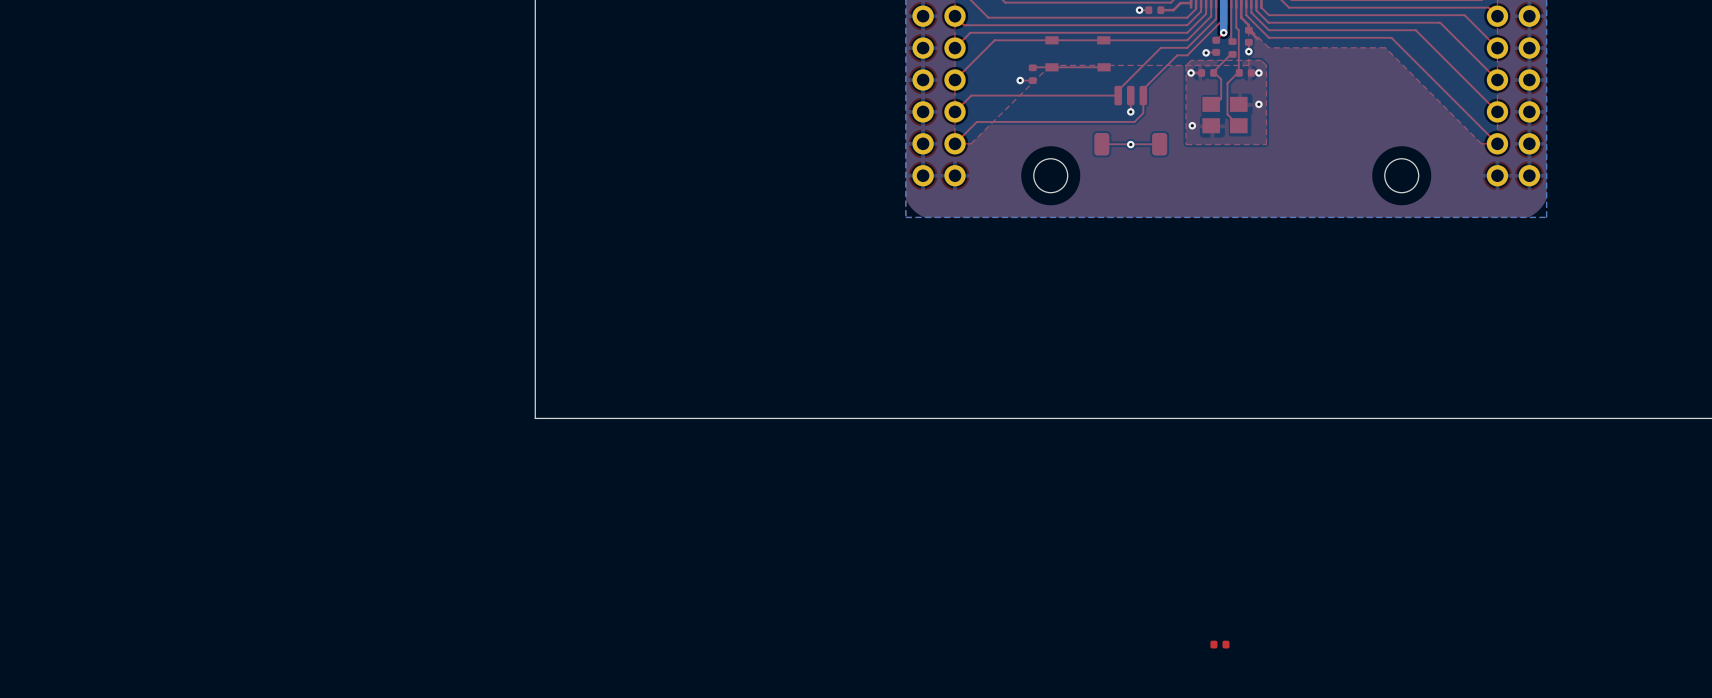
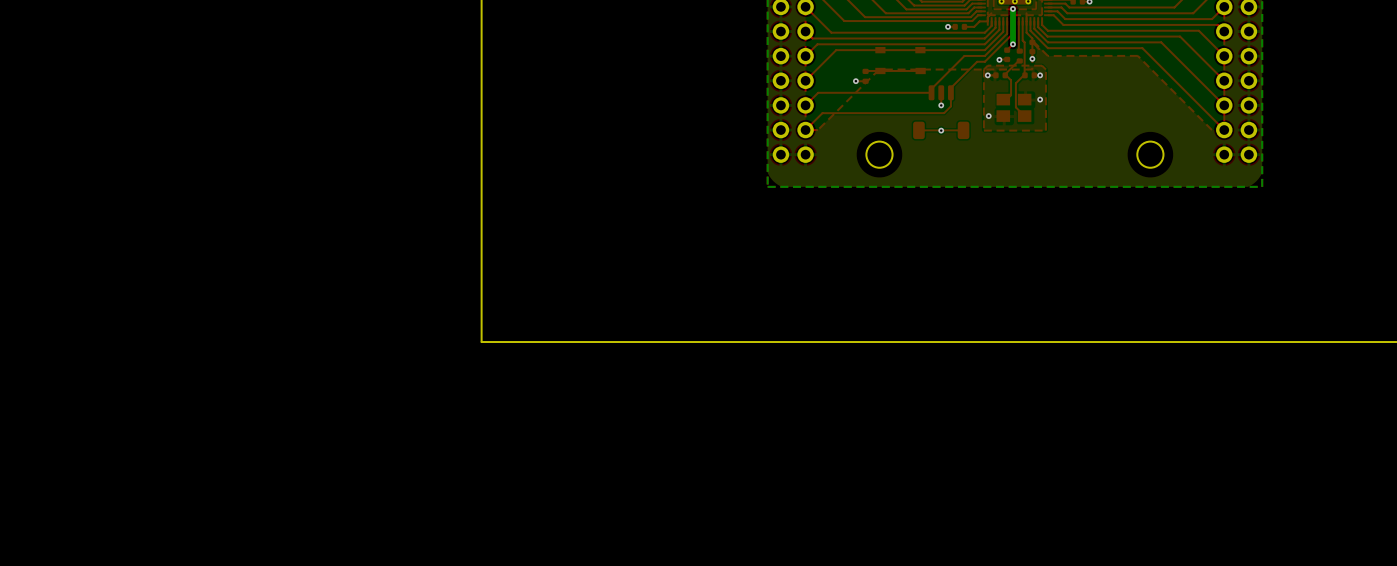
part: (1219, 644) -> none

